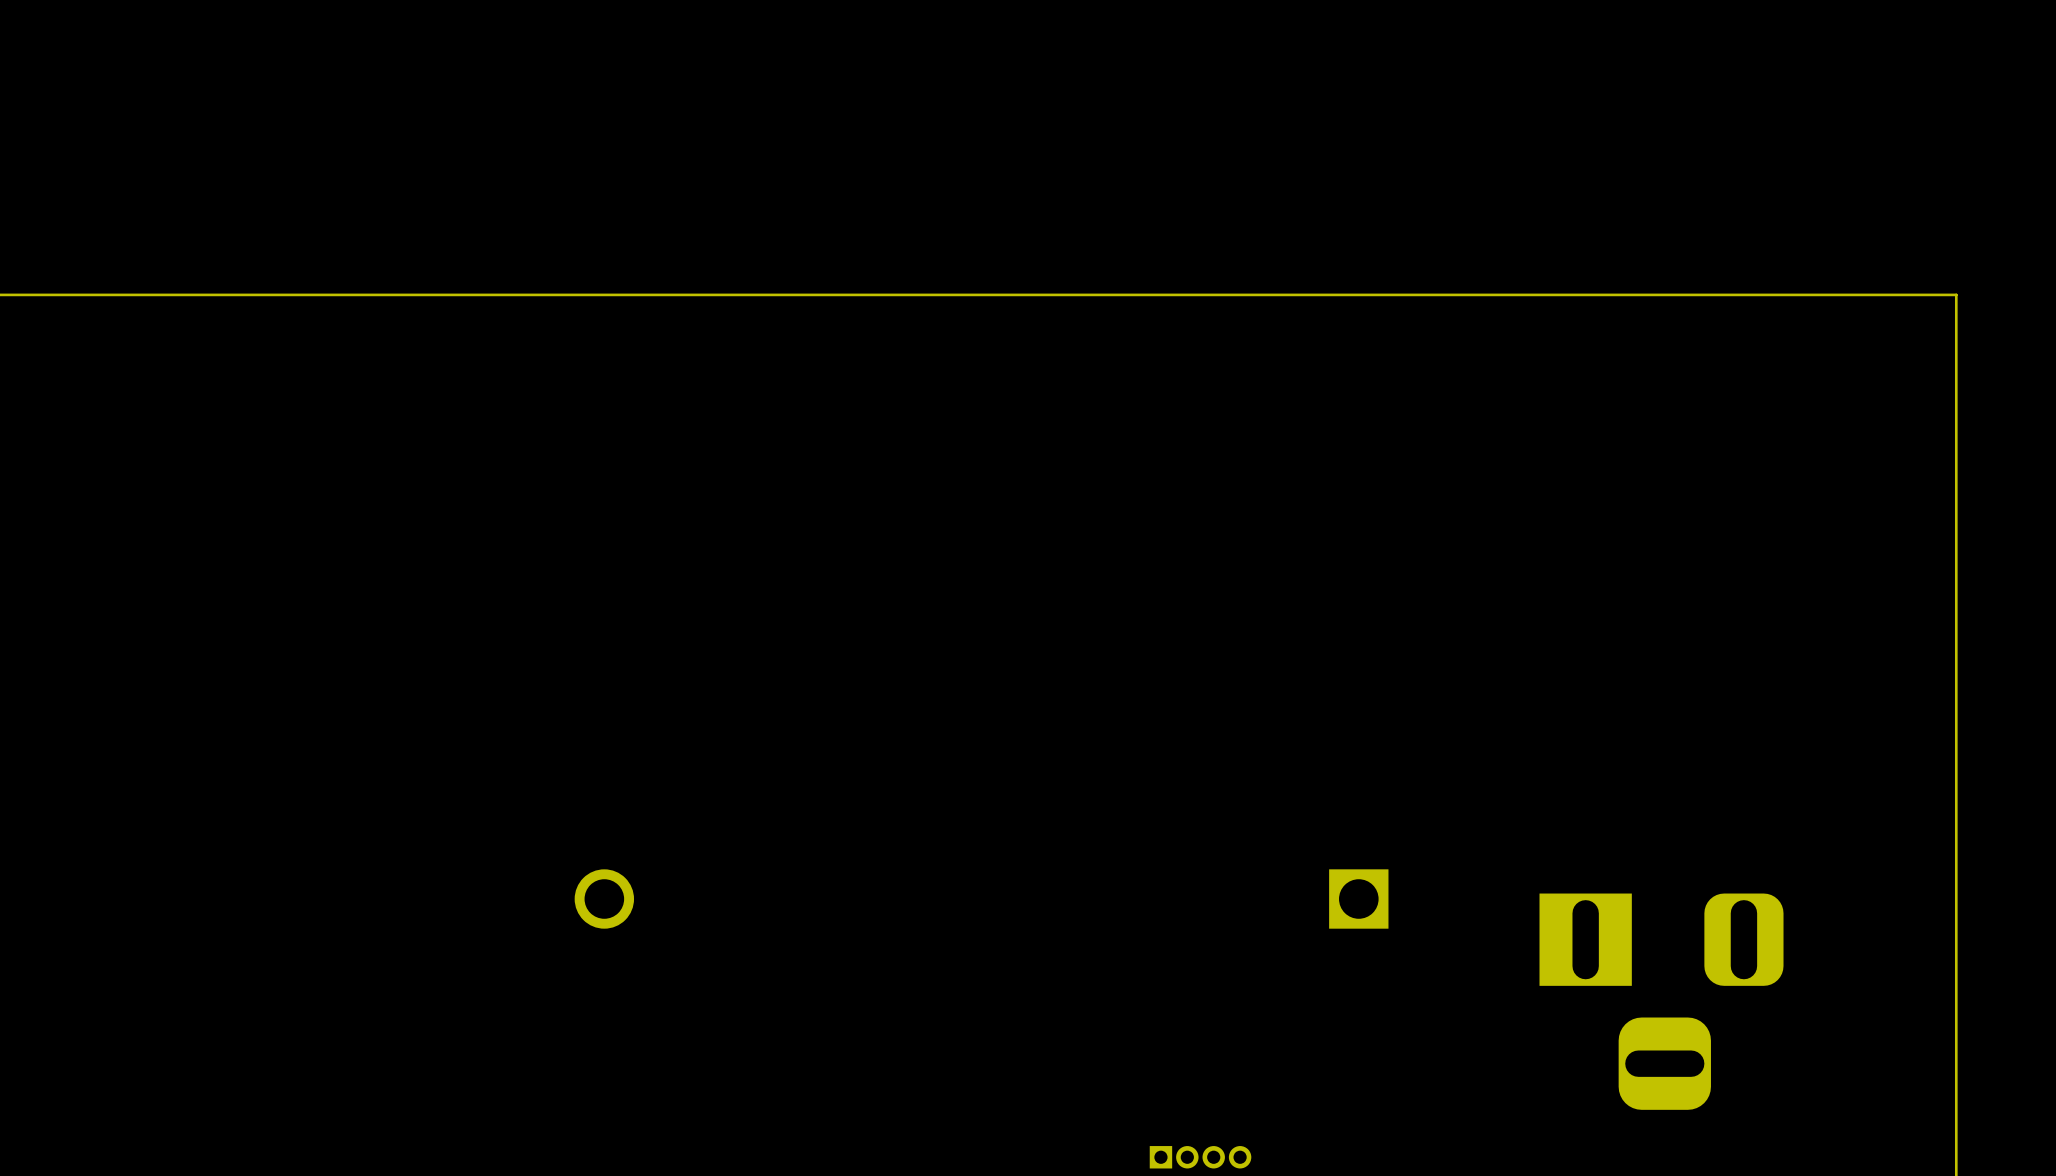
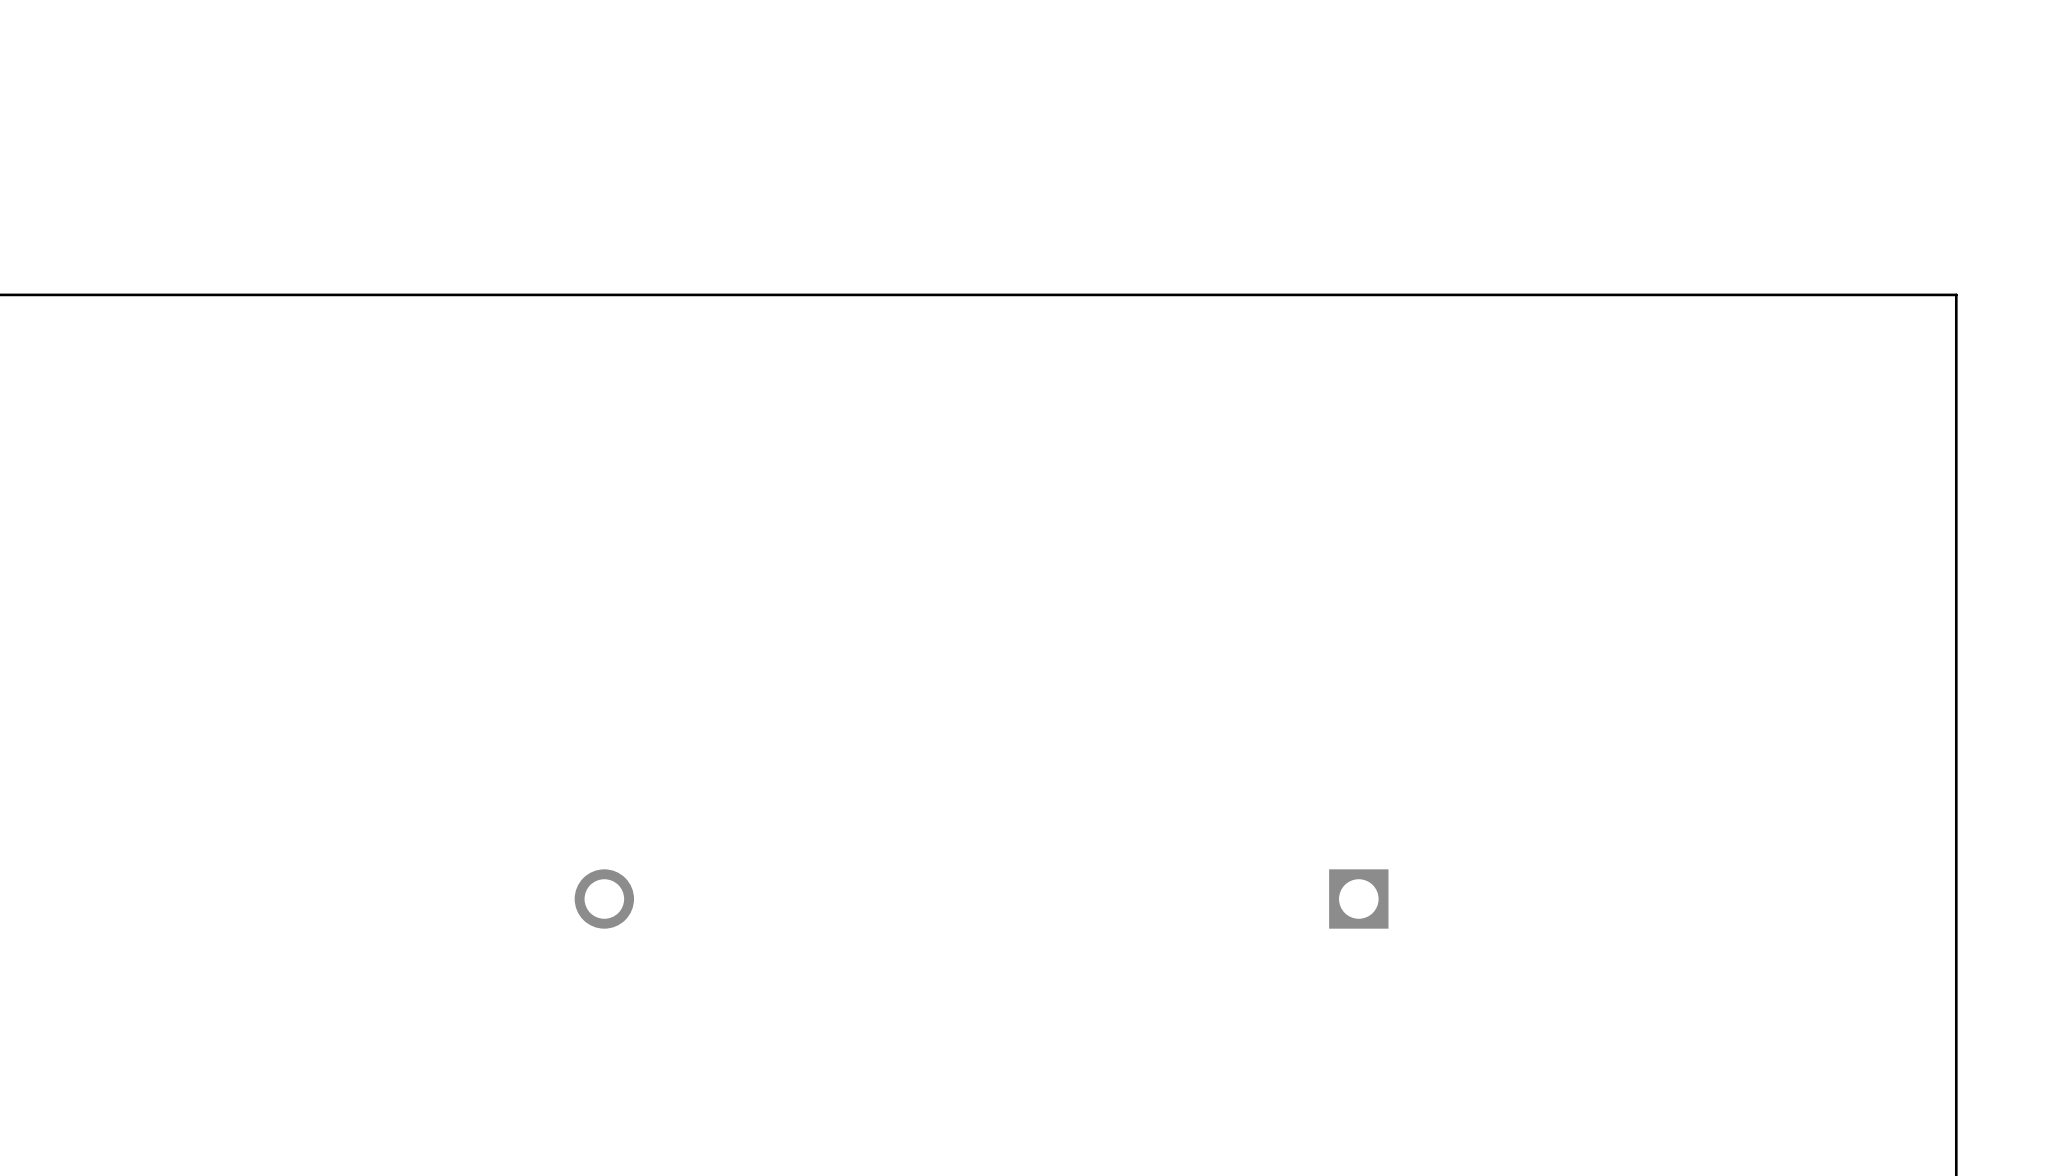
part: (1661, 1001) -> none
part: (1200, 1157) -> none

